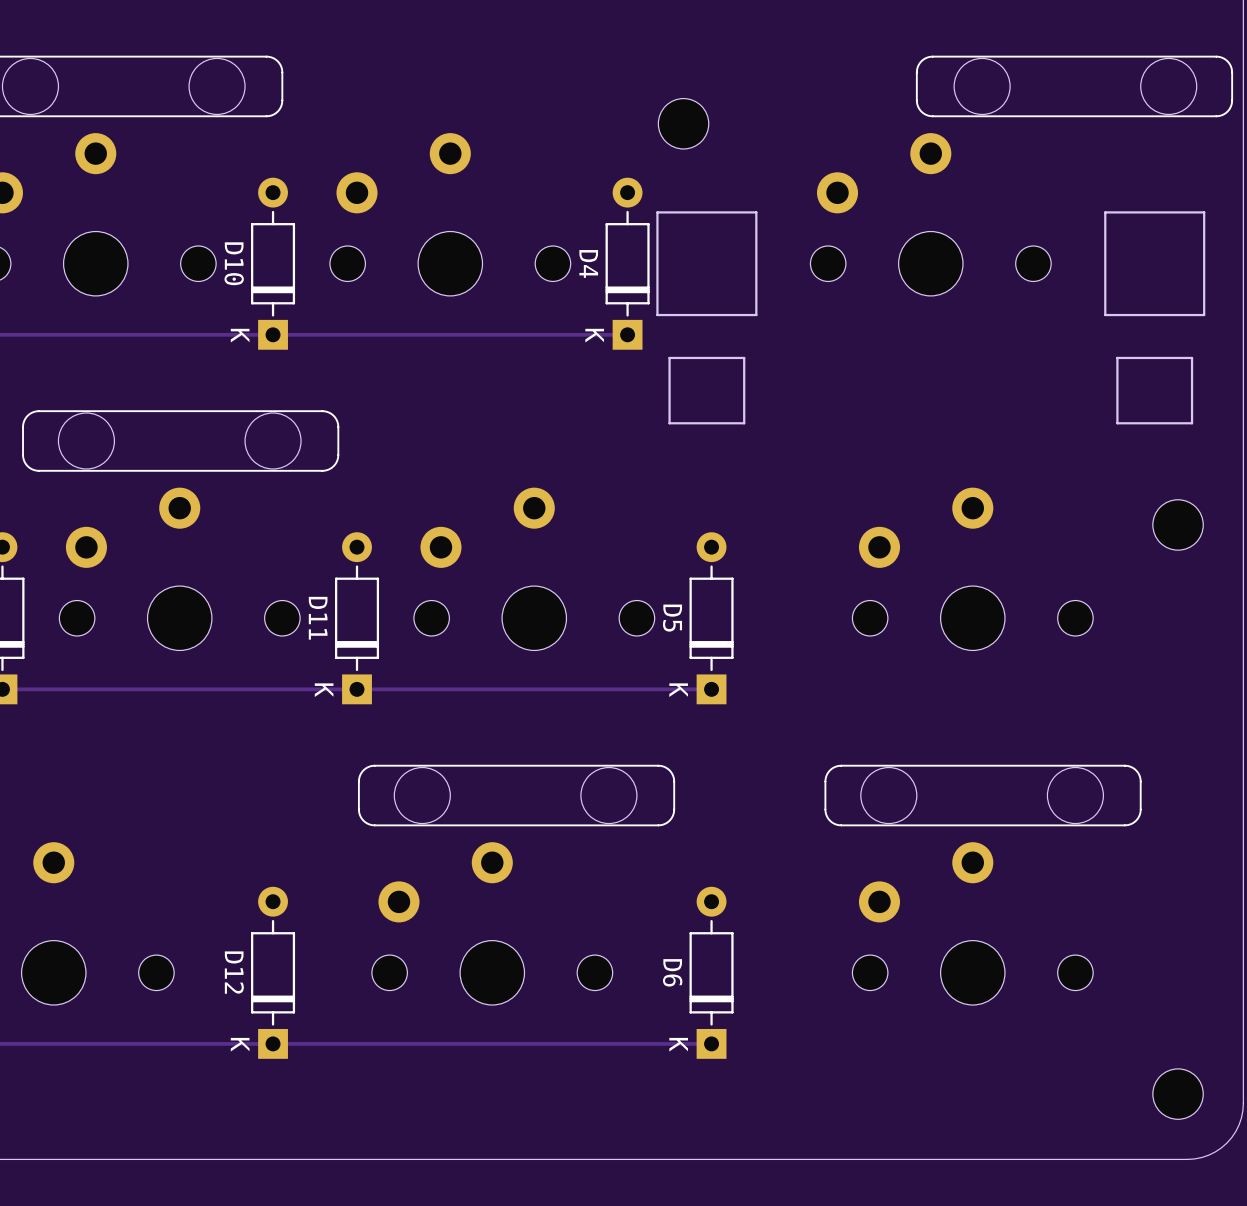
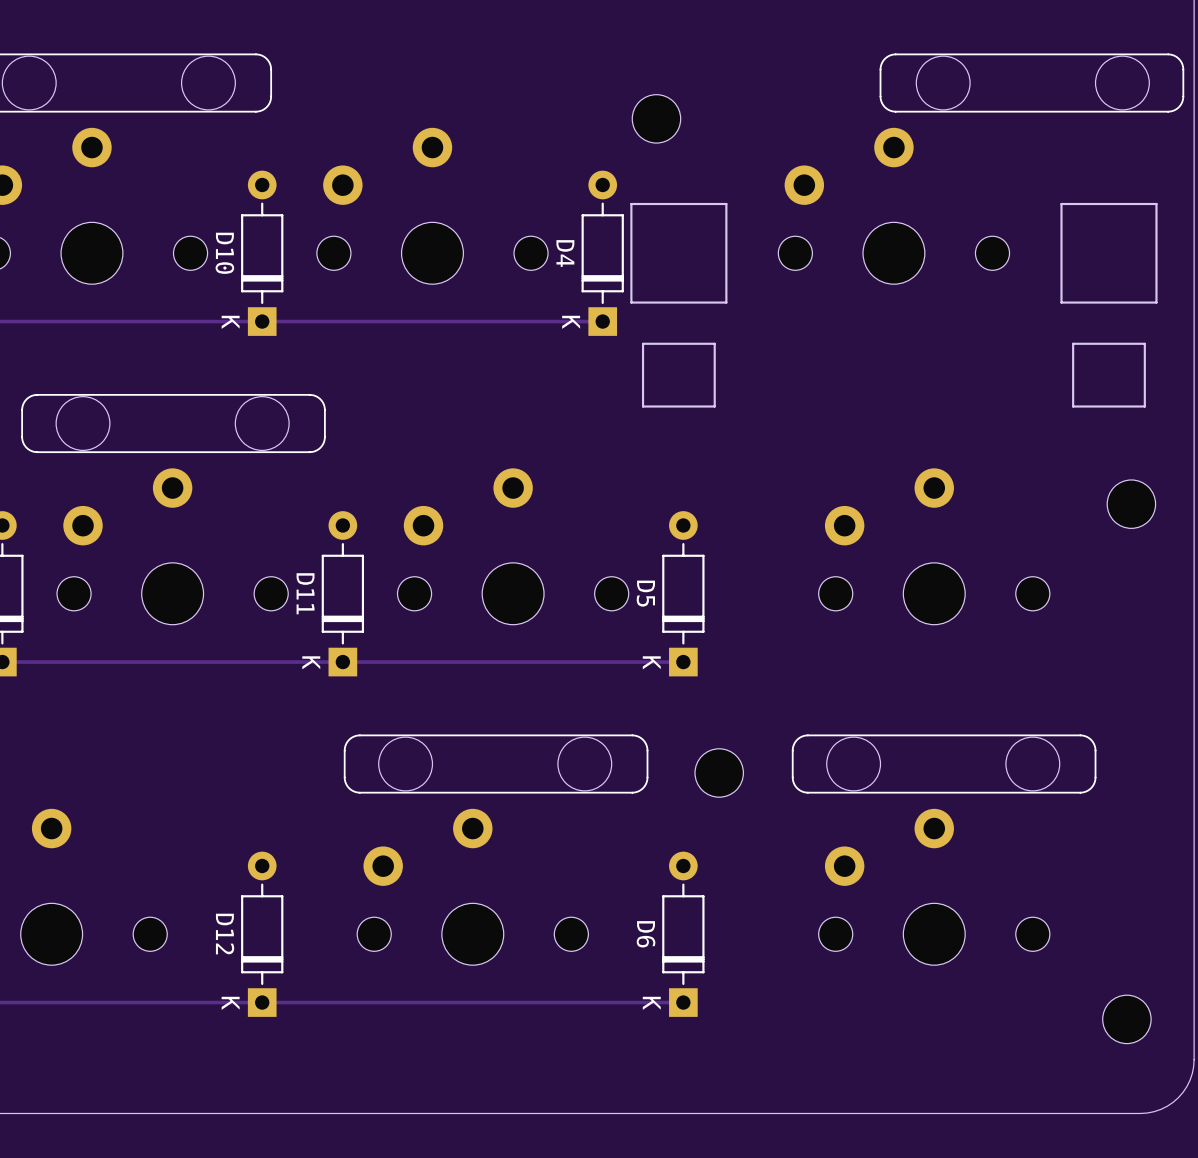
part: none -> (719, 772)
part position: (1178, 1094) -> (1126, 1019)

